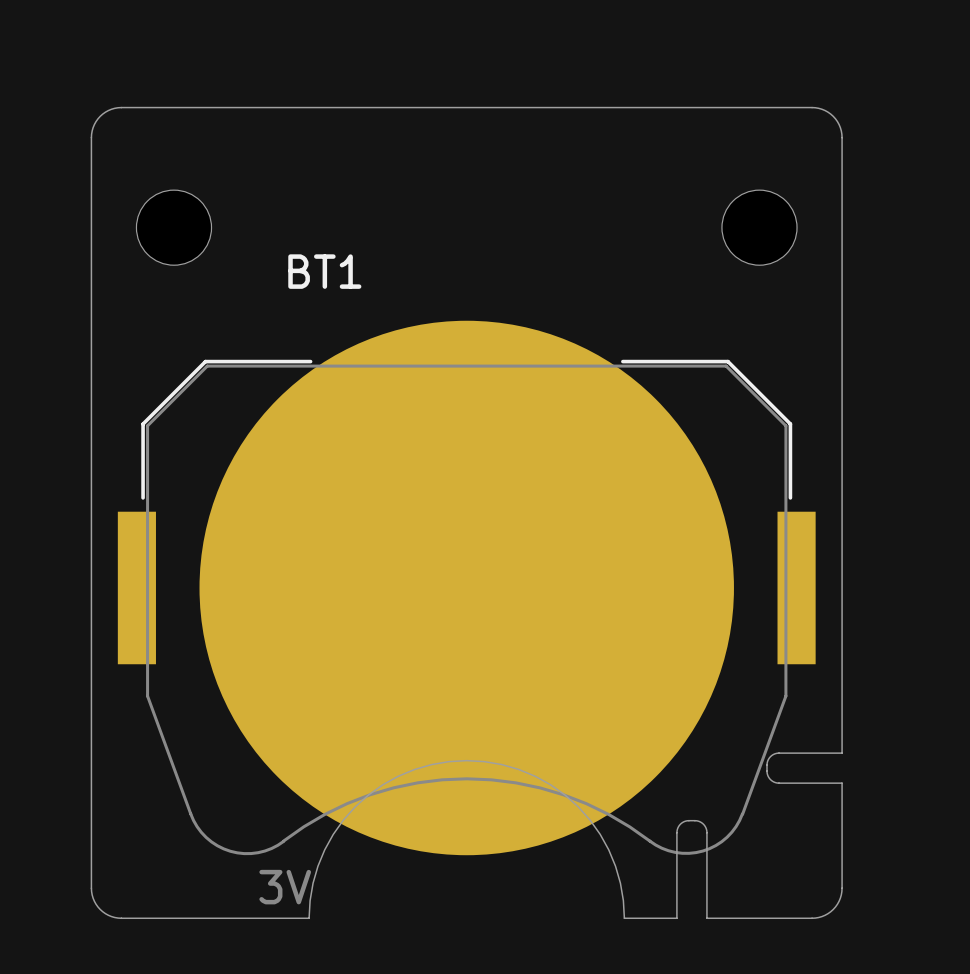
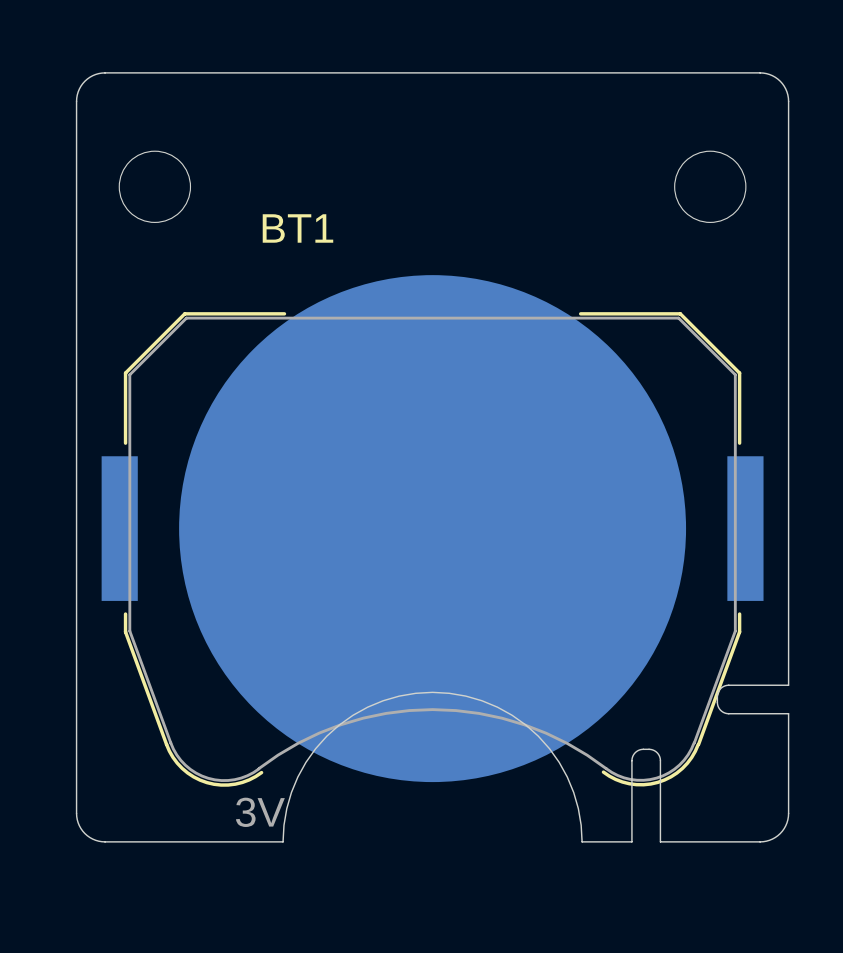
BT1 footprint: [117, 320, 816, 856] -> [101, 275, 764, 787]

